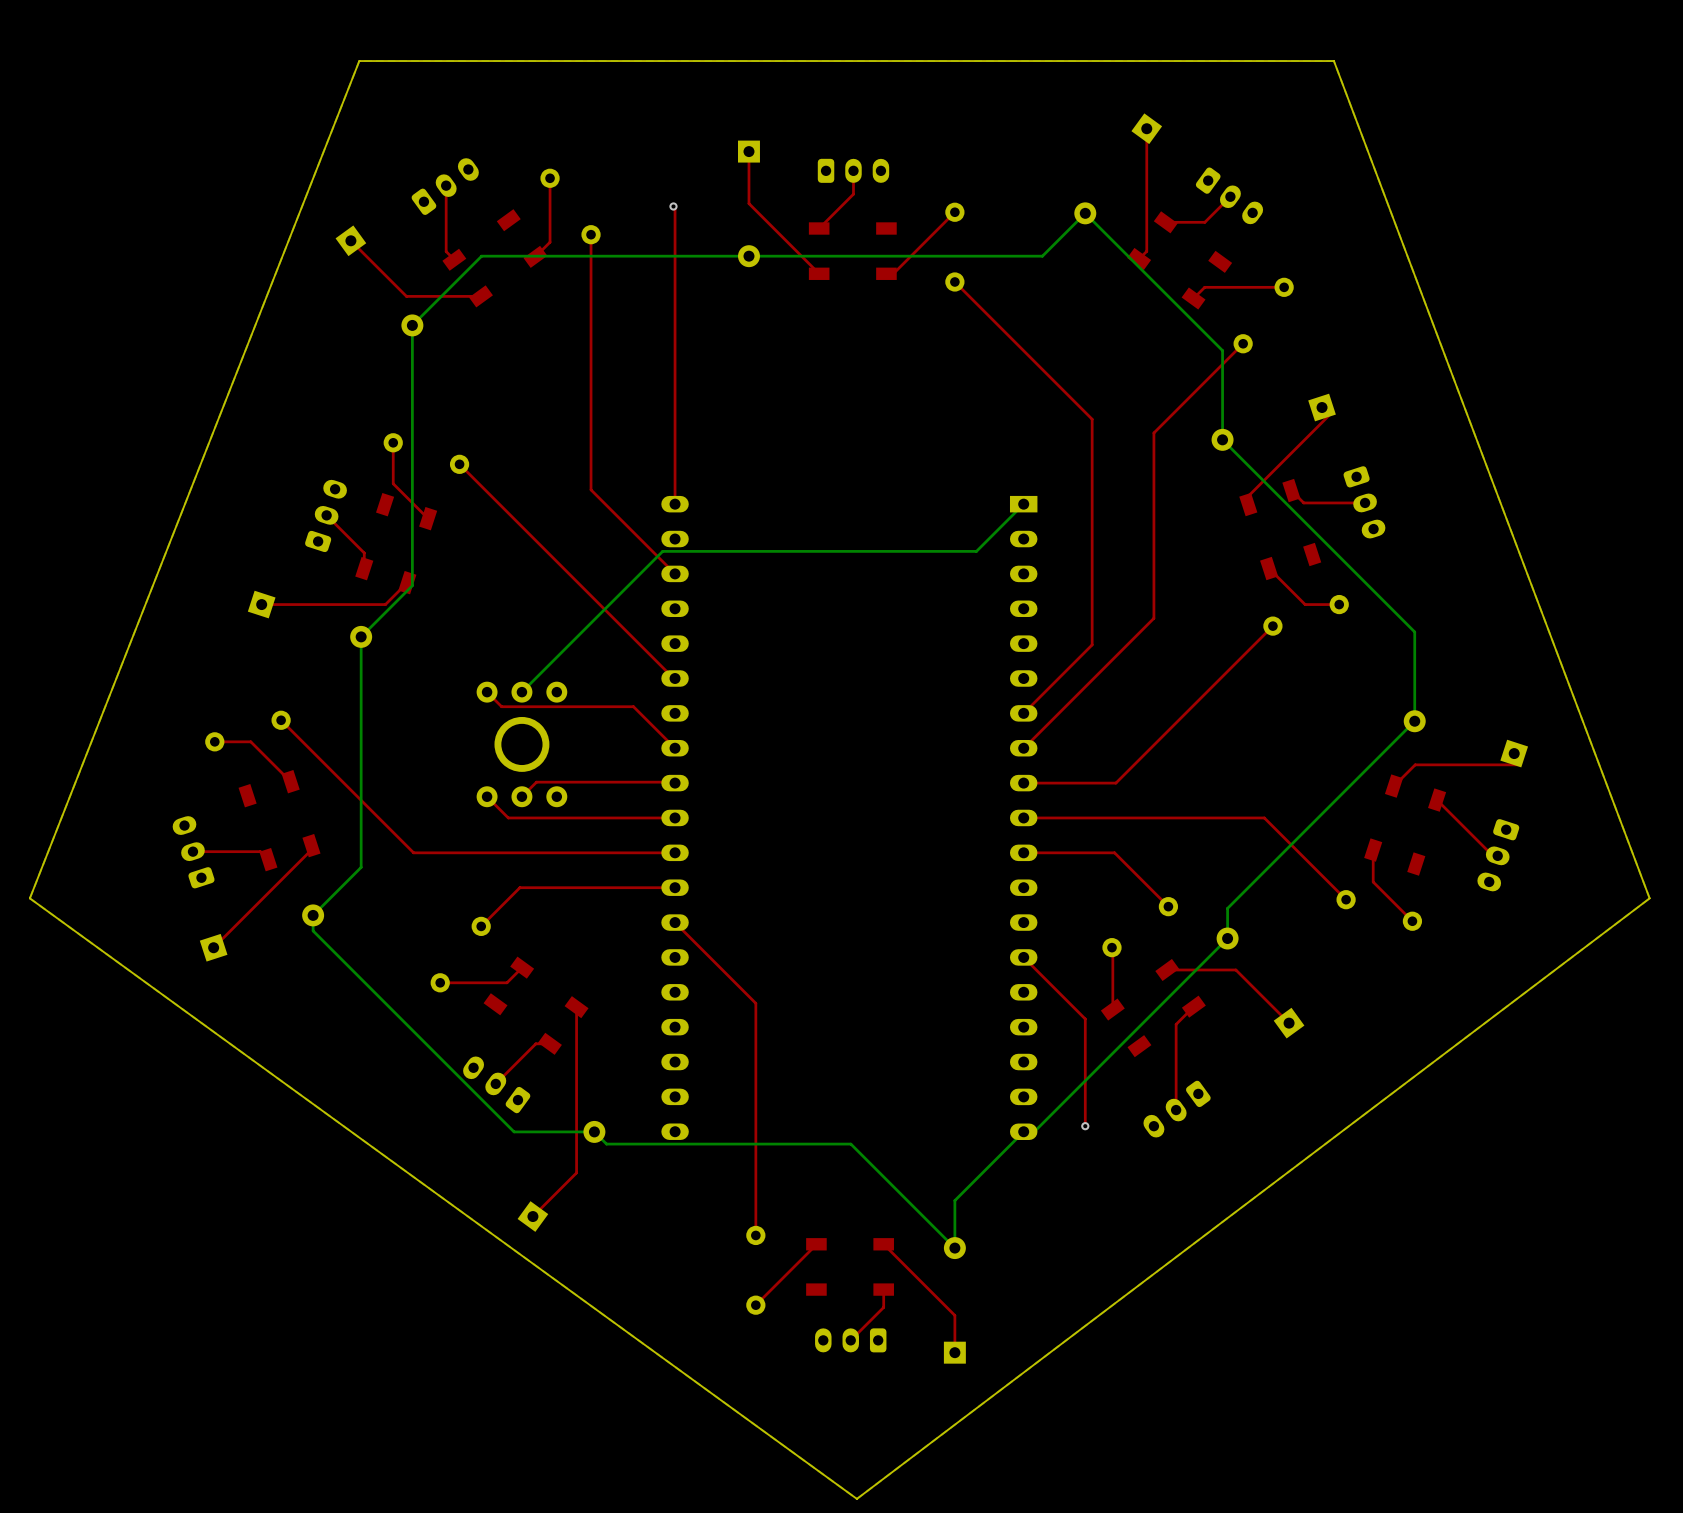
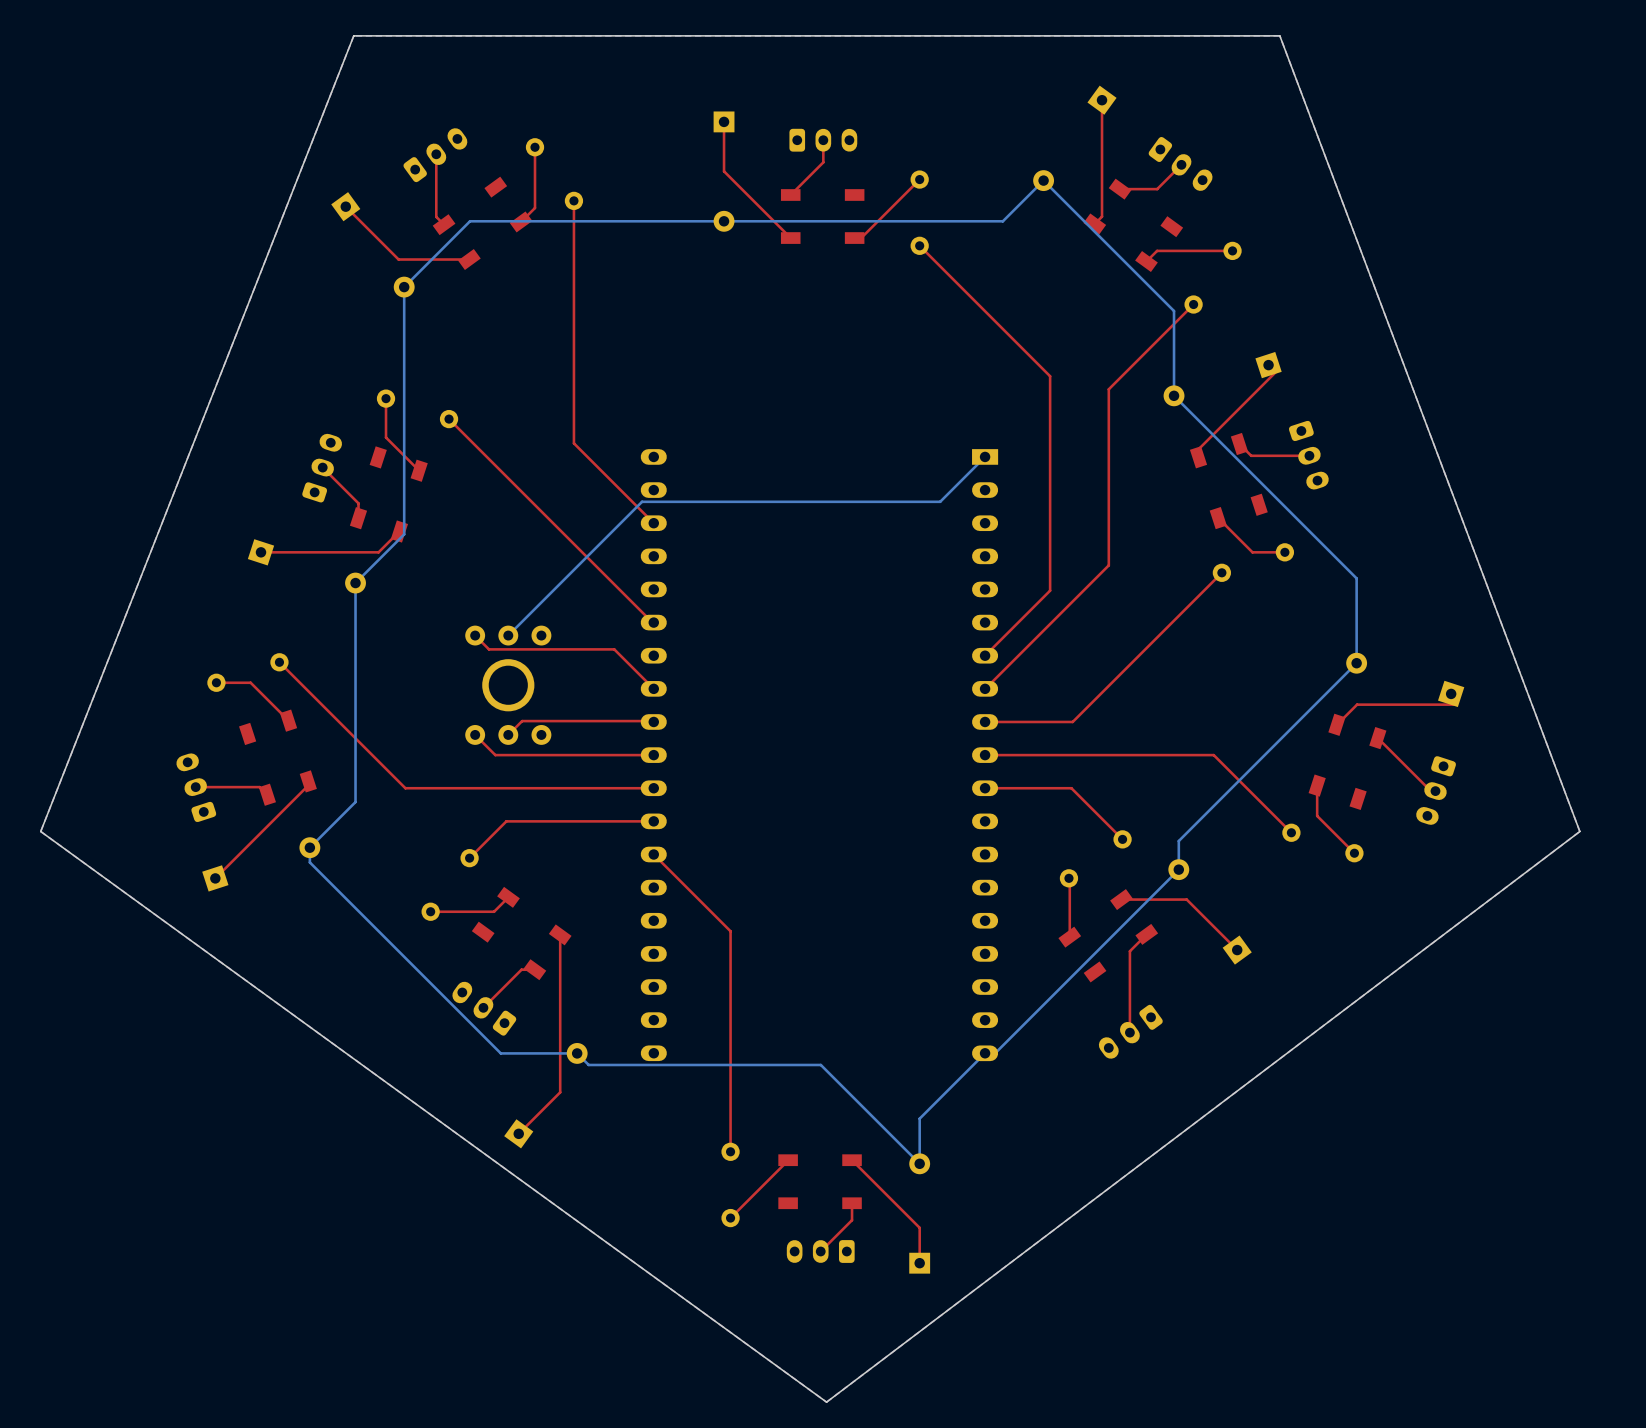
top track: (673, 206) (675, 208) (675, 504) -> none
via: (673, 206) -> none
top track: (1023, 957) (1085, 1019) (1085, 1126) -> none
via: (1085, 1126) -> none

